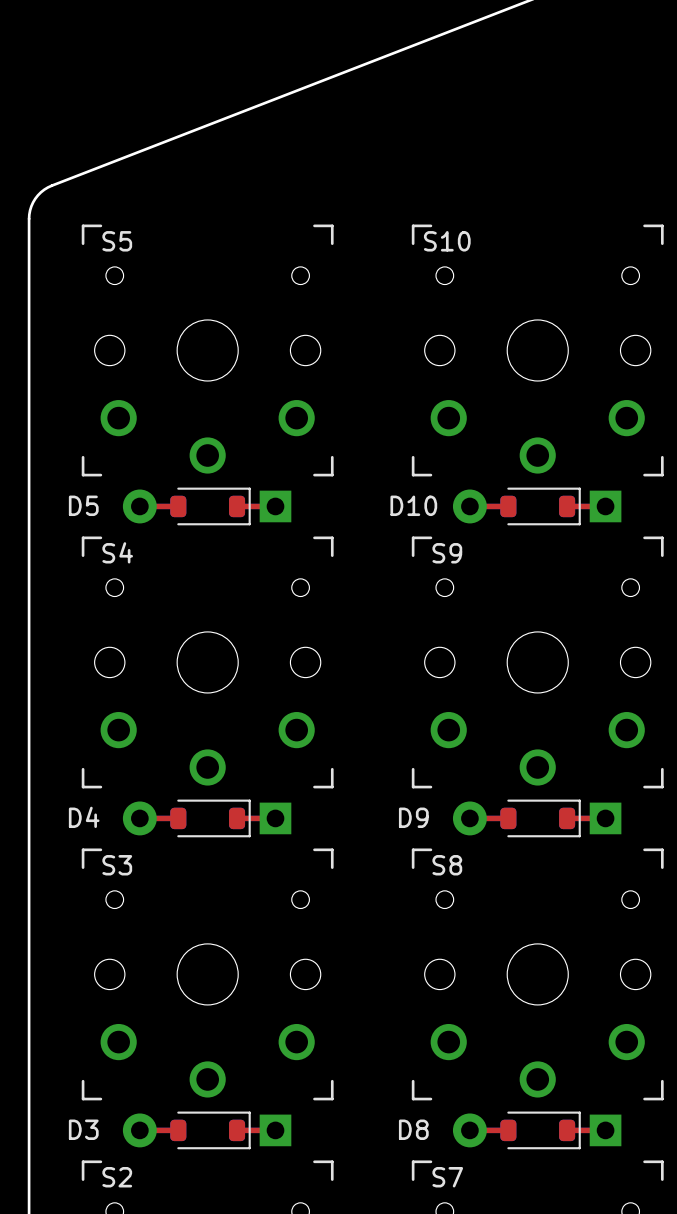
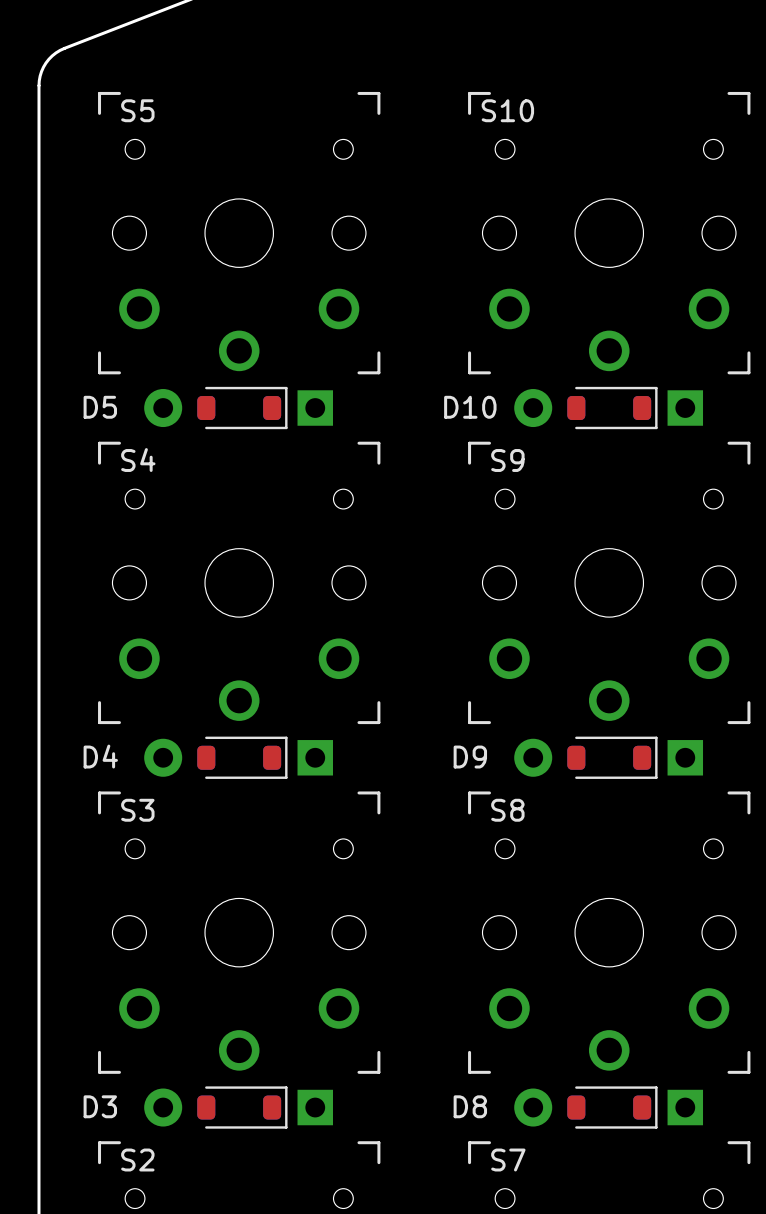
D5 footprint: [122, 487, 292, 526] -> [144, 386, 333, 430]
D10 footprint: [452, 487, 622, 526] -> [514, 386, 704, 430]
D4 footprint: [122, 799, 292, 838] -> [144, 736, 333, 779]
D9 footprint: [452, 799, 622, 838] -> [514, 736, 704, 779]
D3 footprint: [122, 1111, 292, 1150] -> [144, 1086, 333, 1129]
D8 footprint: [452, 1111, 622, 1150] -> [514, 1086, 704, 1129]

